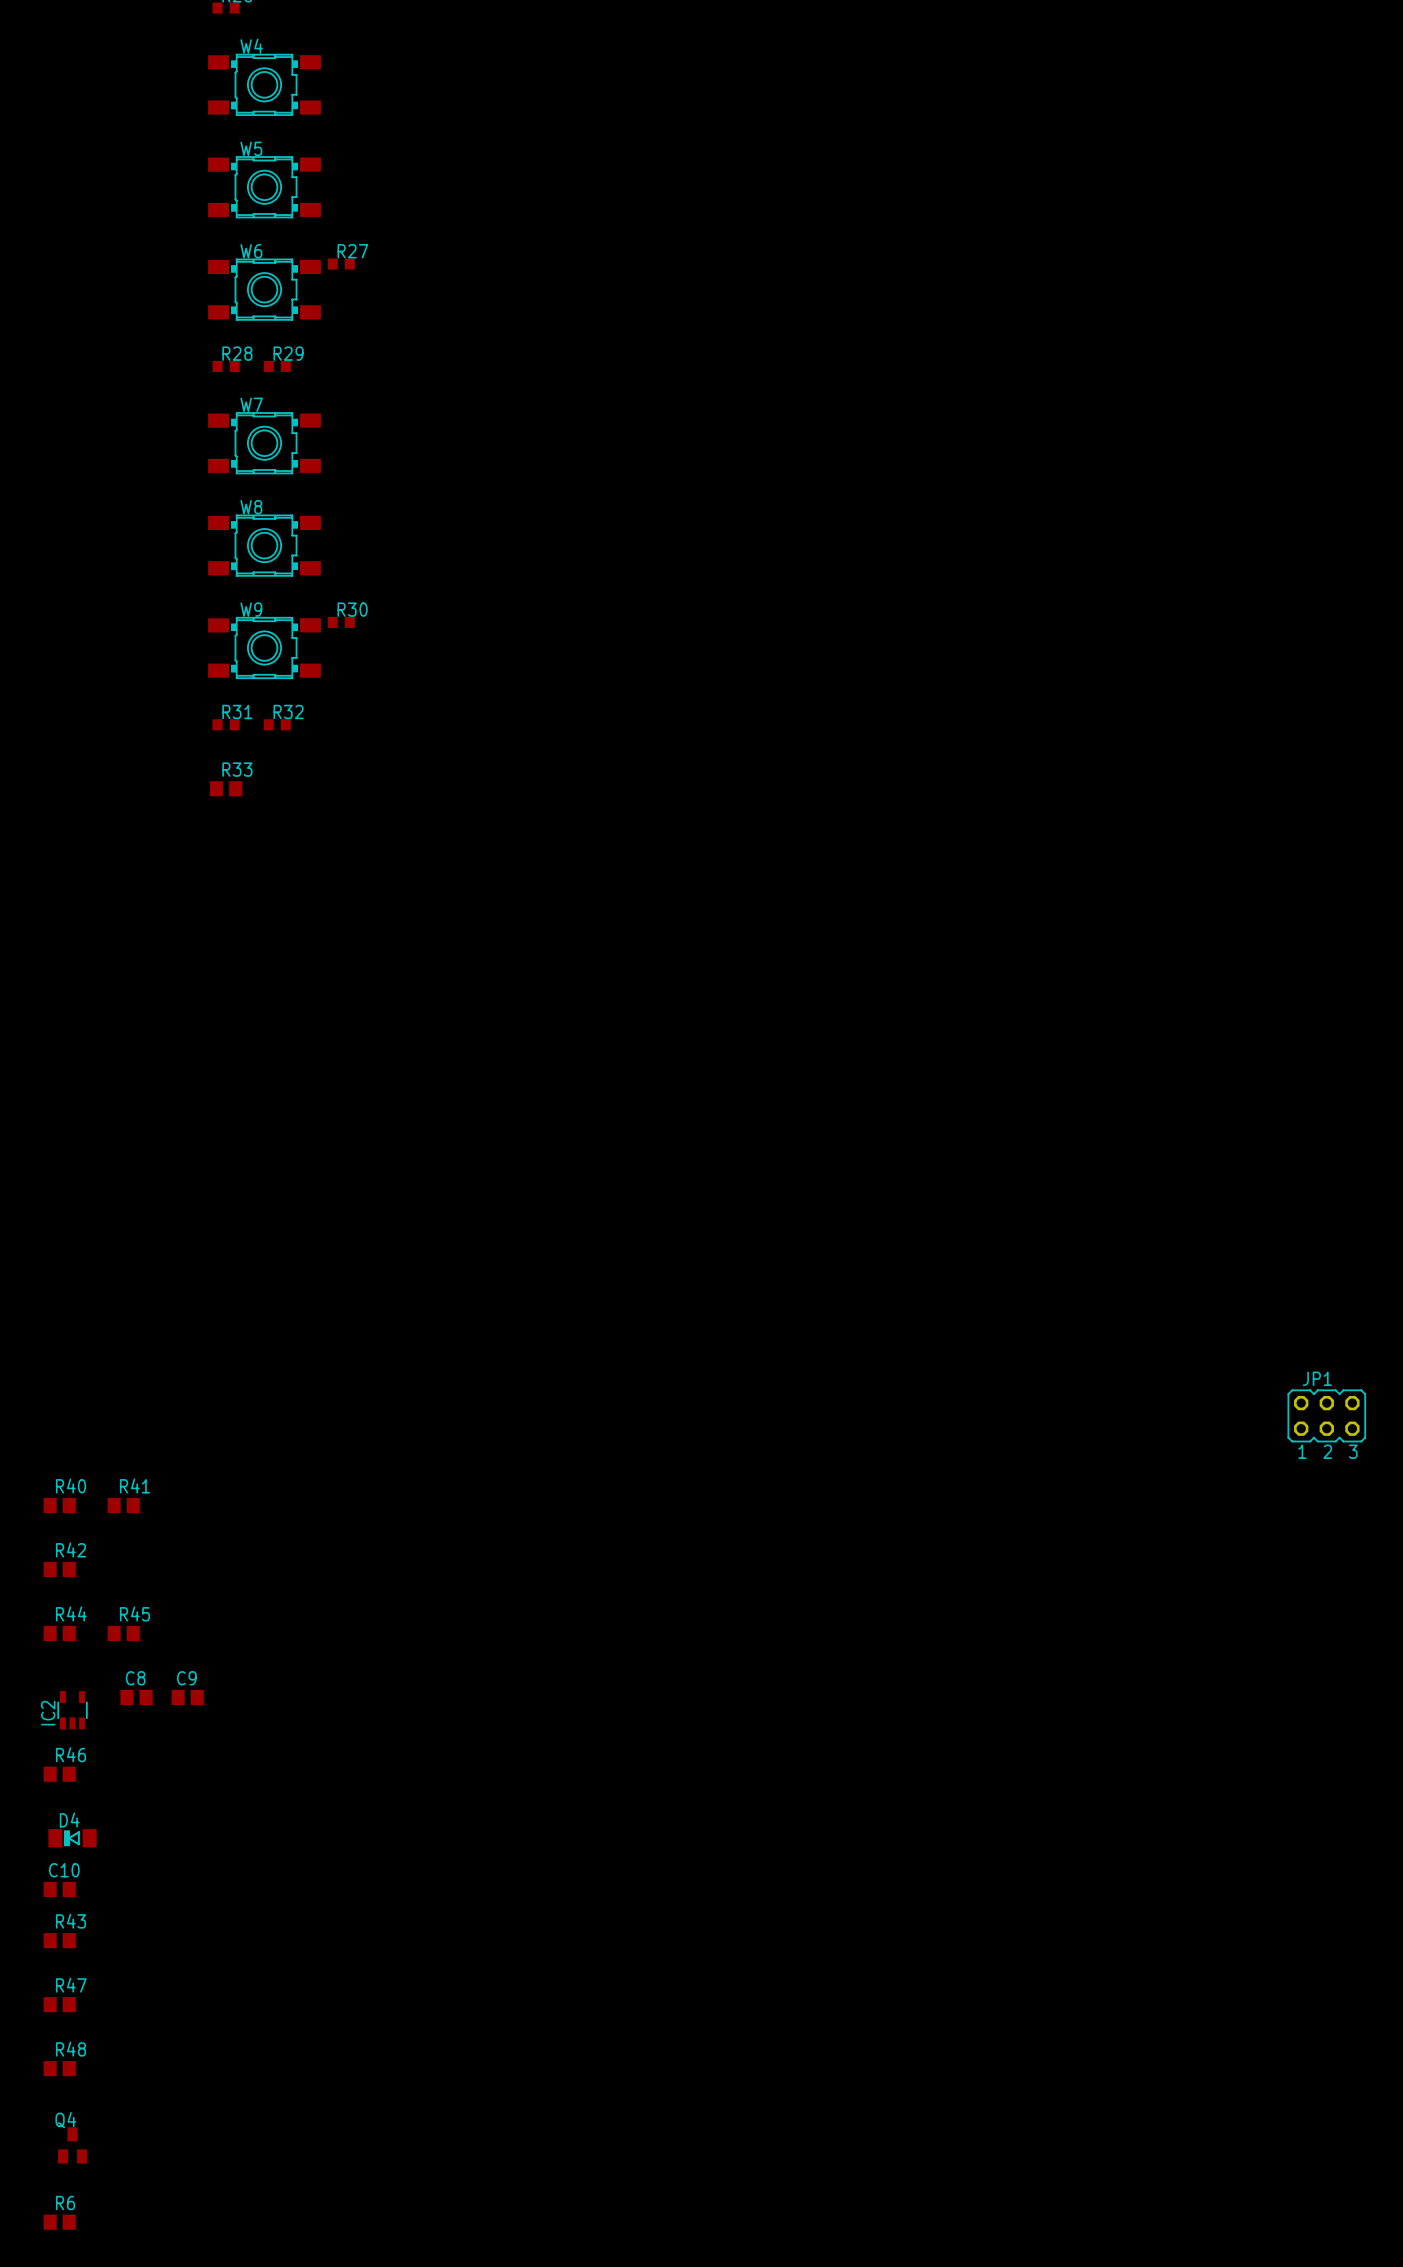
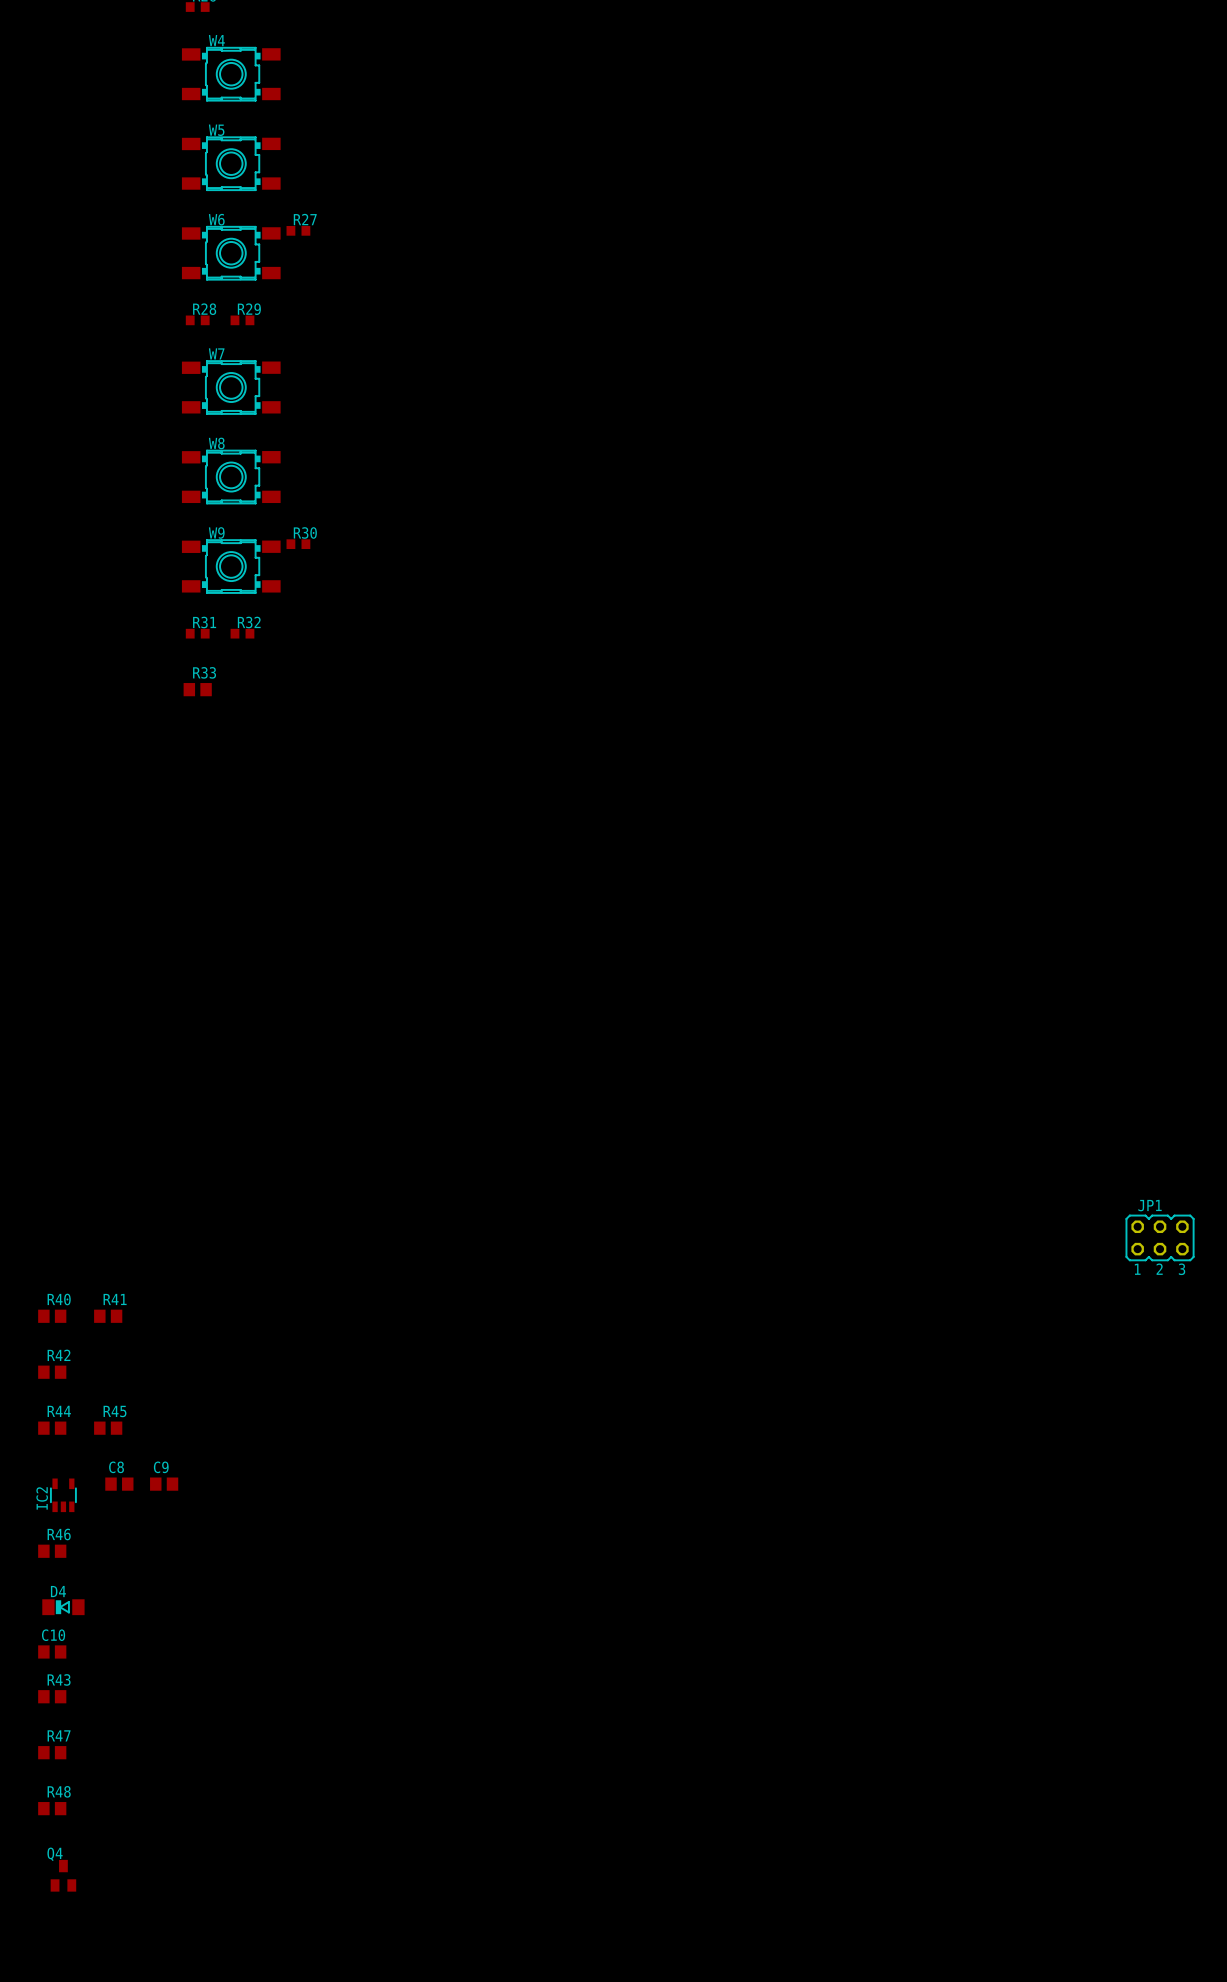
R6: (59, 2222) -> none

